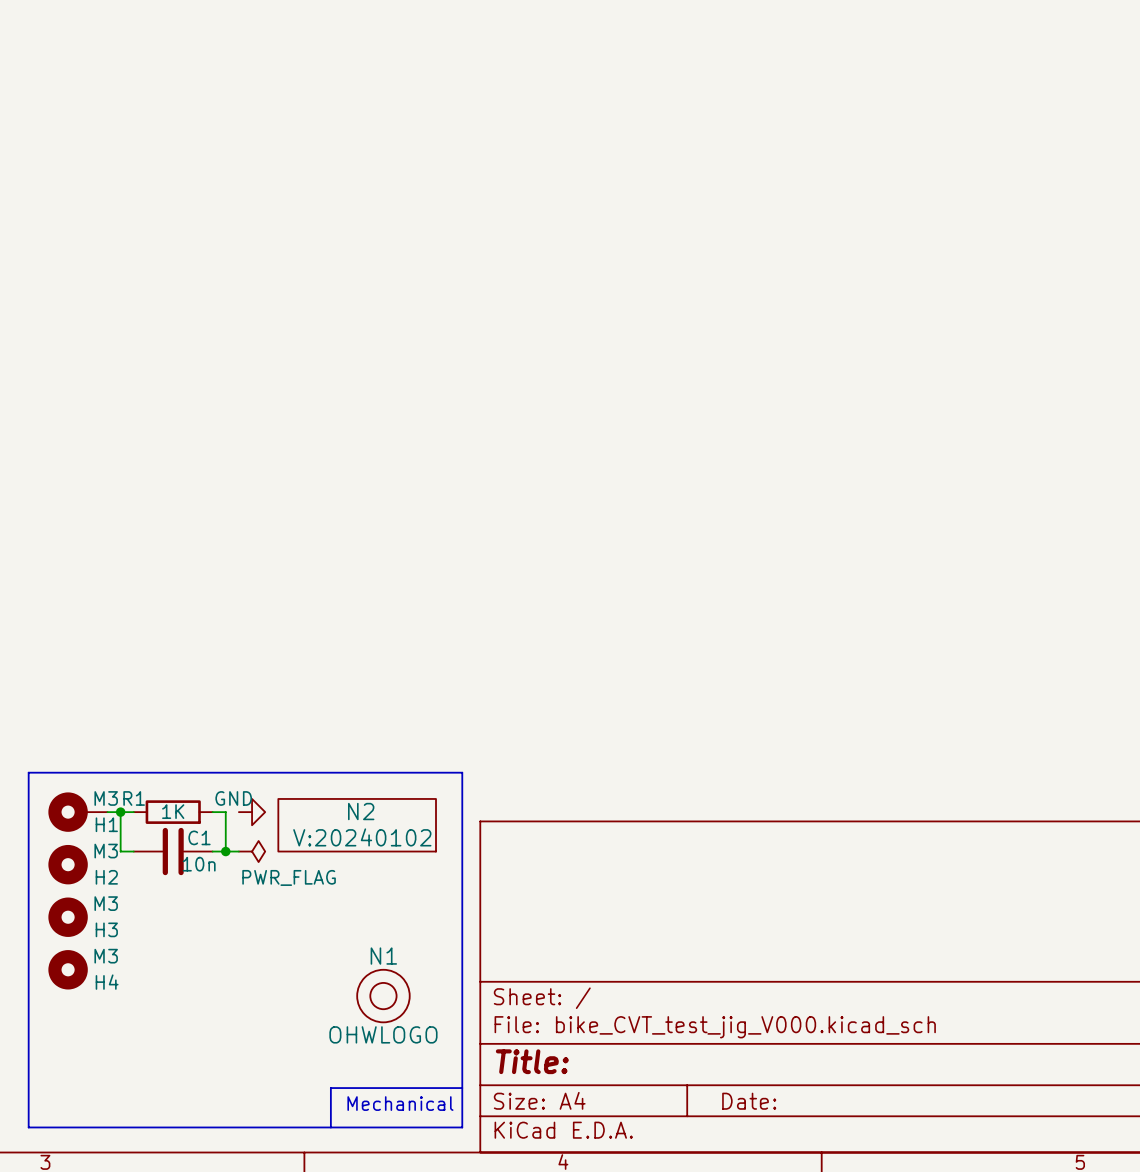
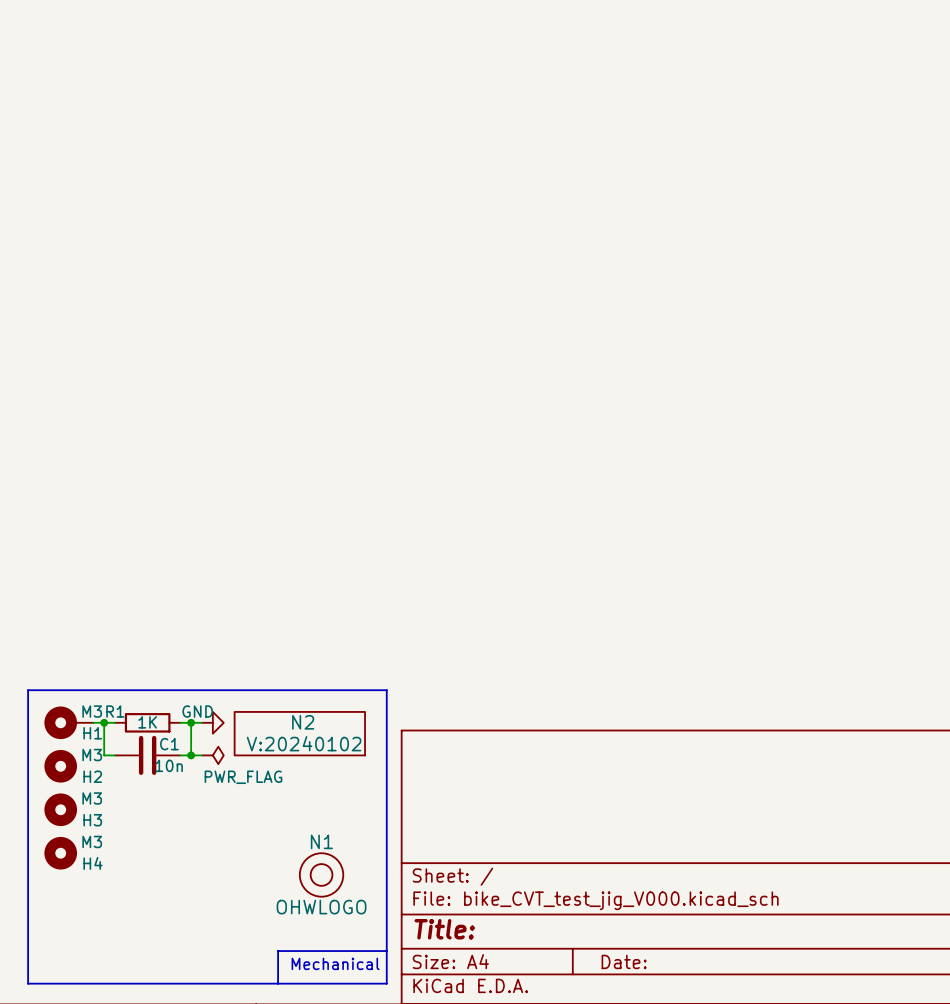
wire: none -> (191, 722) (202, 722)
junction: none -> (191, 722)

